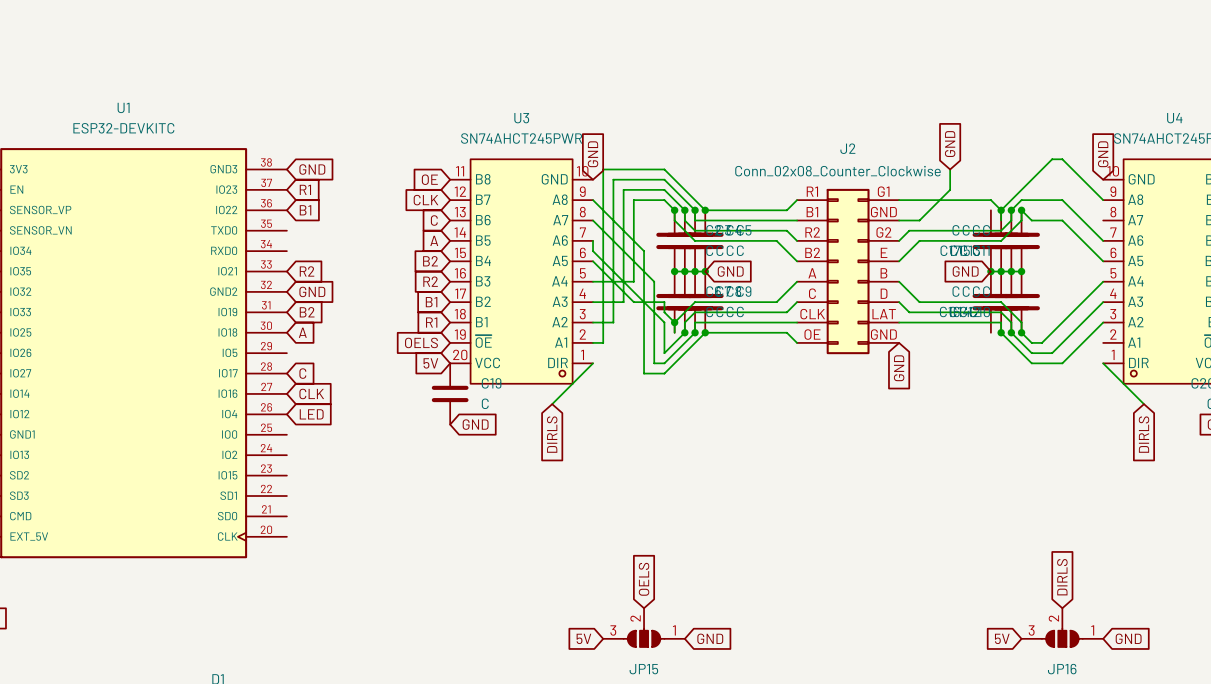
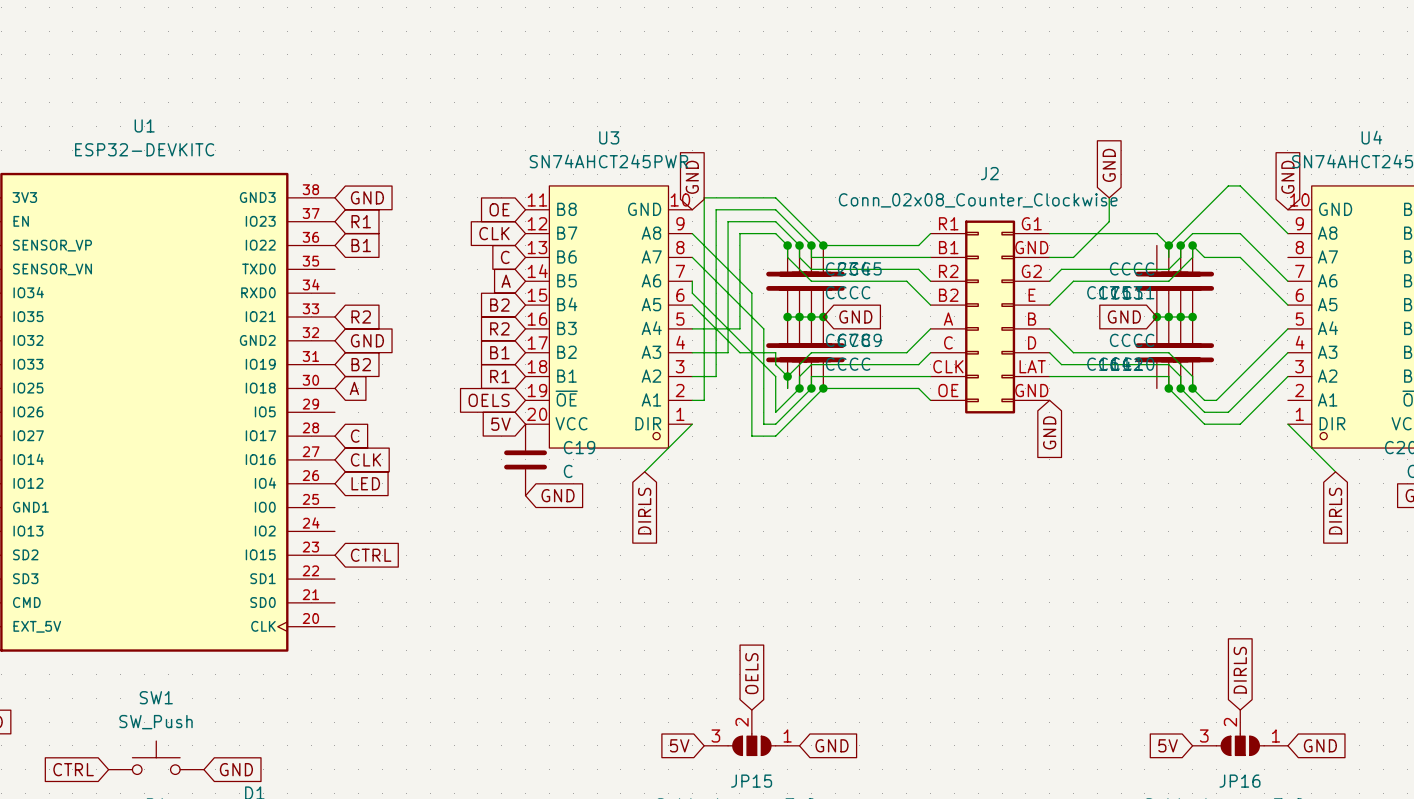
global label: none -> CTRL (371, 555)
SW1: none -> SW_Push (156, 757)
global label: none -> CTRL (73, 769)
global label: none -> GND (236, 769)

